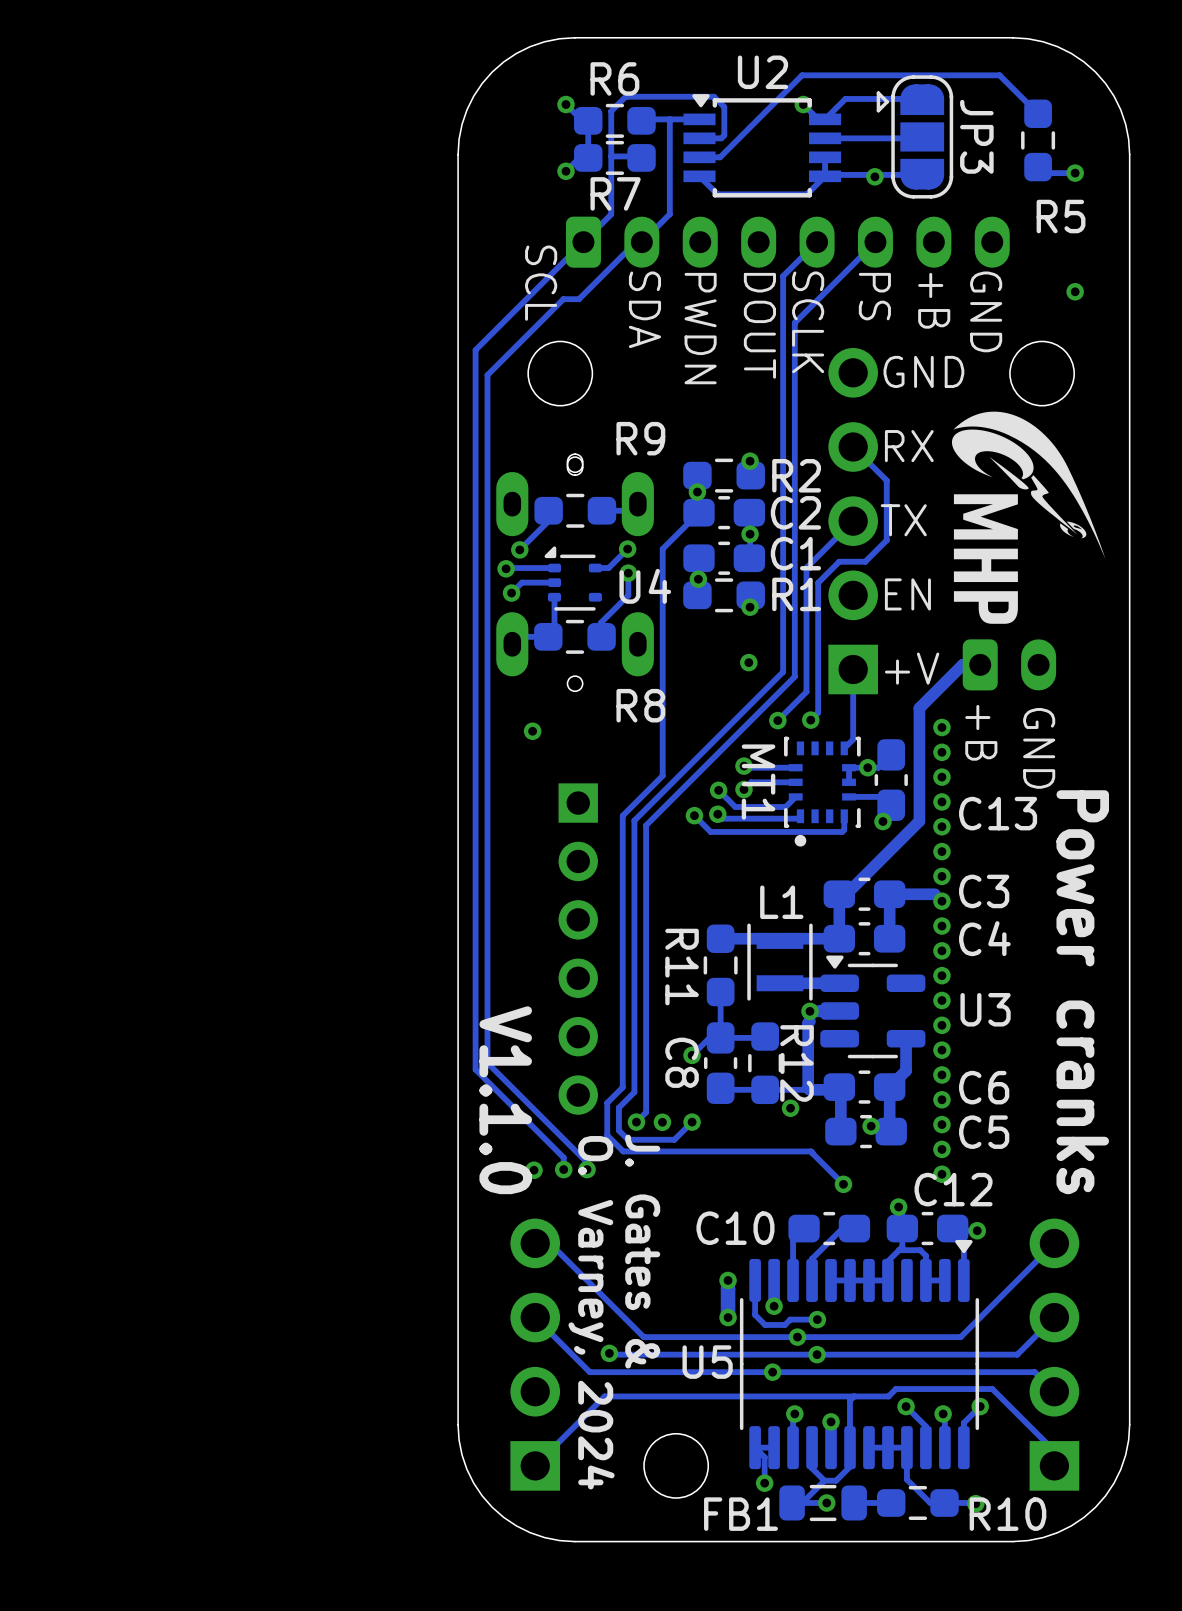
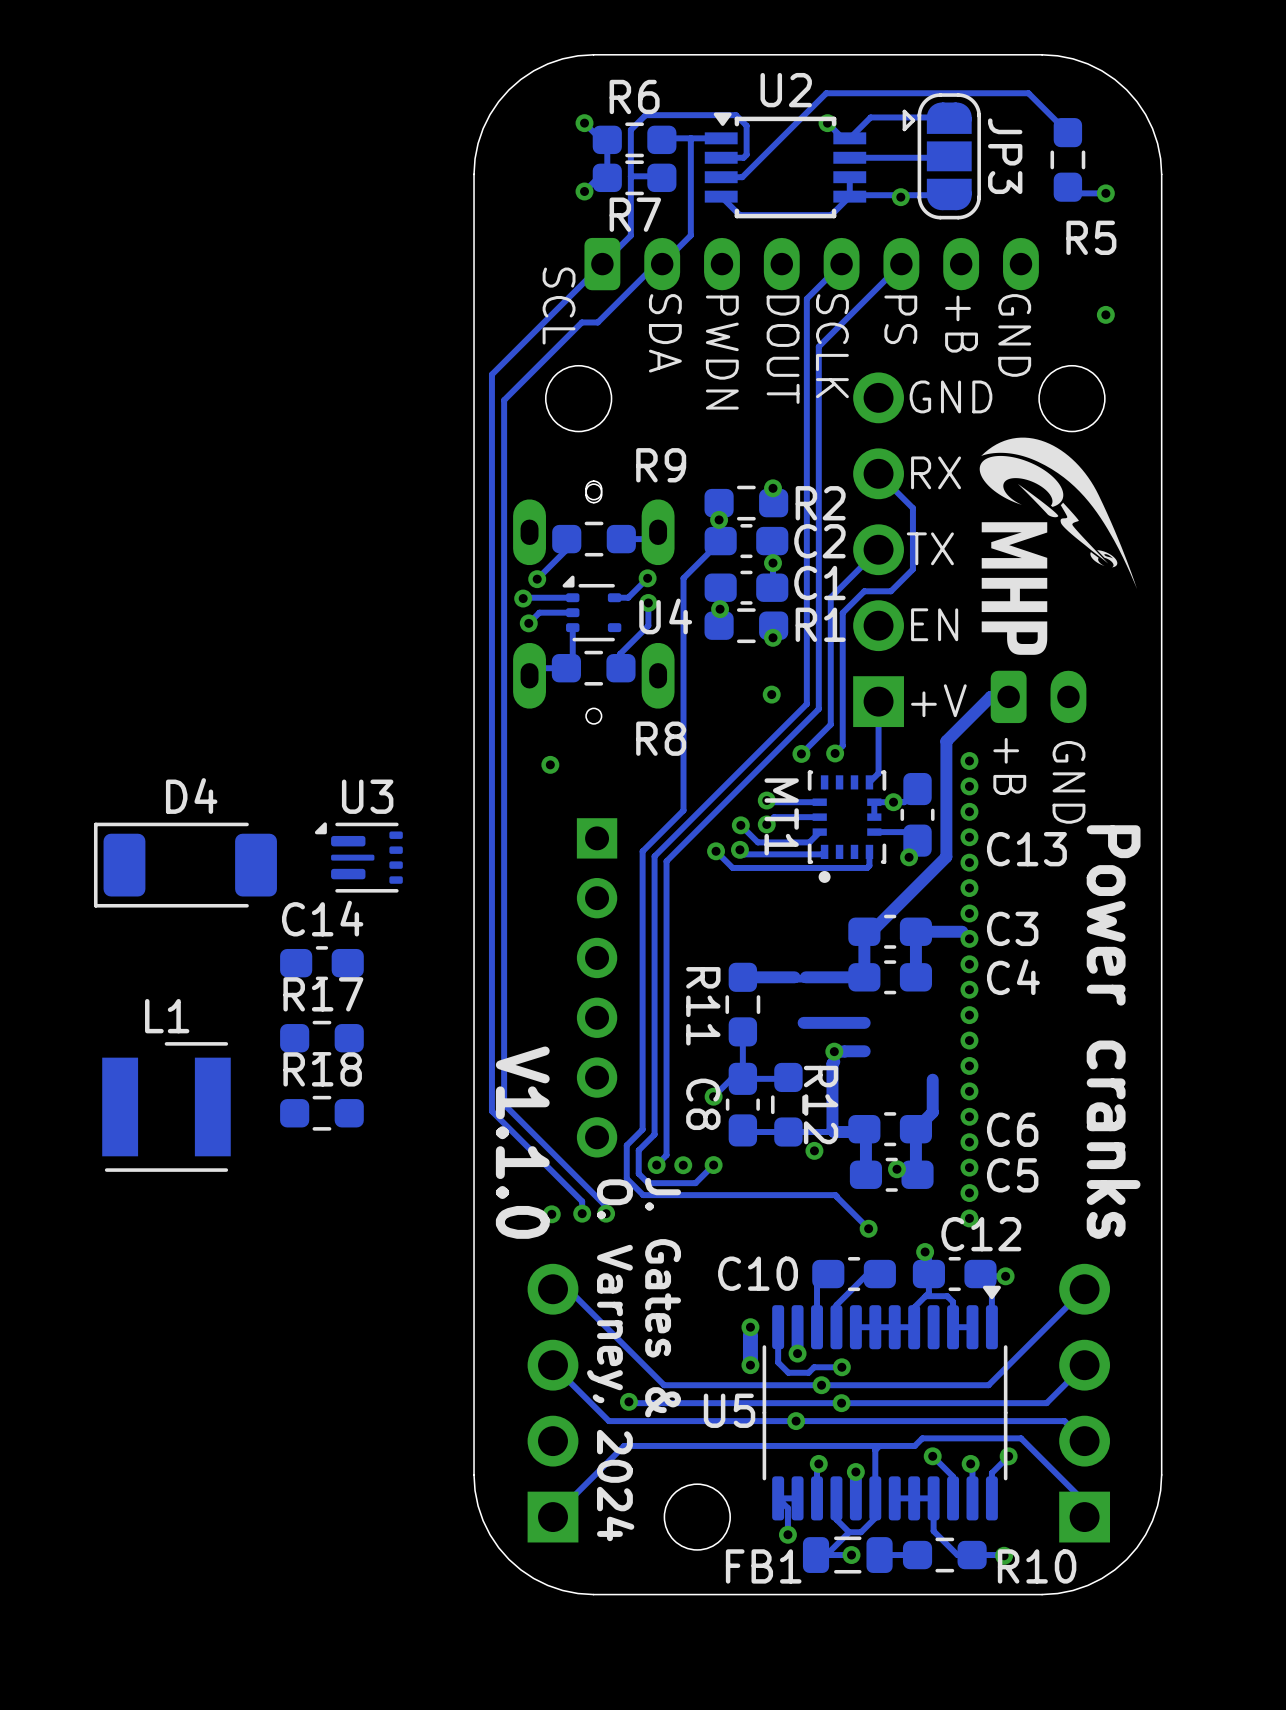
D4: none -> (185, 865)
L1 footprint: [747, 923, 813, 1001] -> [102, 1042, 231, 1172]
C14: none -> (321, 963)
U3 footprint: [820, 955, 926, 1059] -> [314, 822, 403, 893]
R17: none -> (321, 1038)
U3 name position: U3 (985, 1009) -> U3 (367, 796)
R18: none -> (321, 1113)

